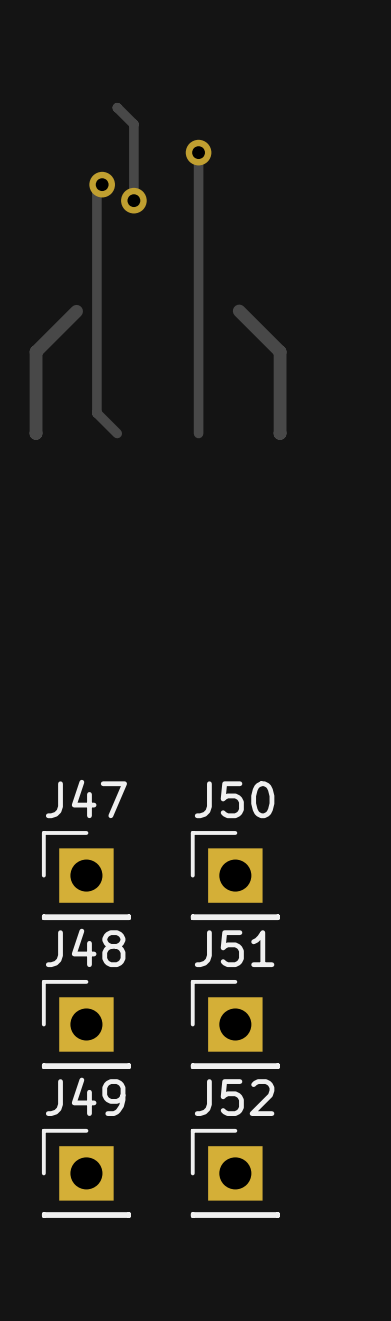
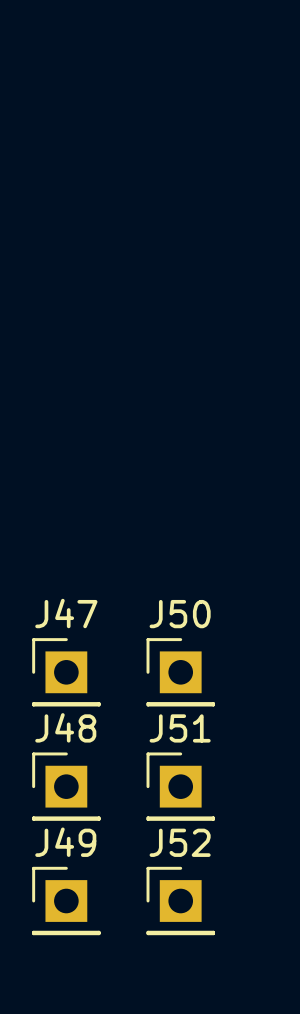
track: (117, 107) (133, 124) (133, 200) -> none
track: (198, 152) (198, 433) -> none
via: (198, 152) -> none
track: (102, 184) (96, 189) (96, 413) (117, 433) -> none
via: (102, 184) -> none
via: (133, 200) -> none
track: (76, 311) (36, 351) (36, 433) -> none
track: (239, 311) (280, 351) (280, 433) -> none

